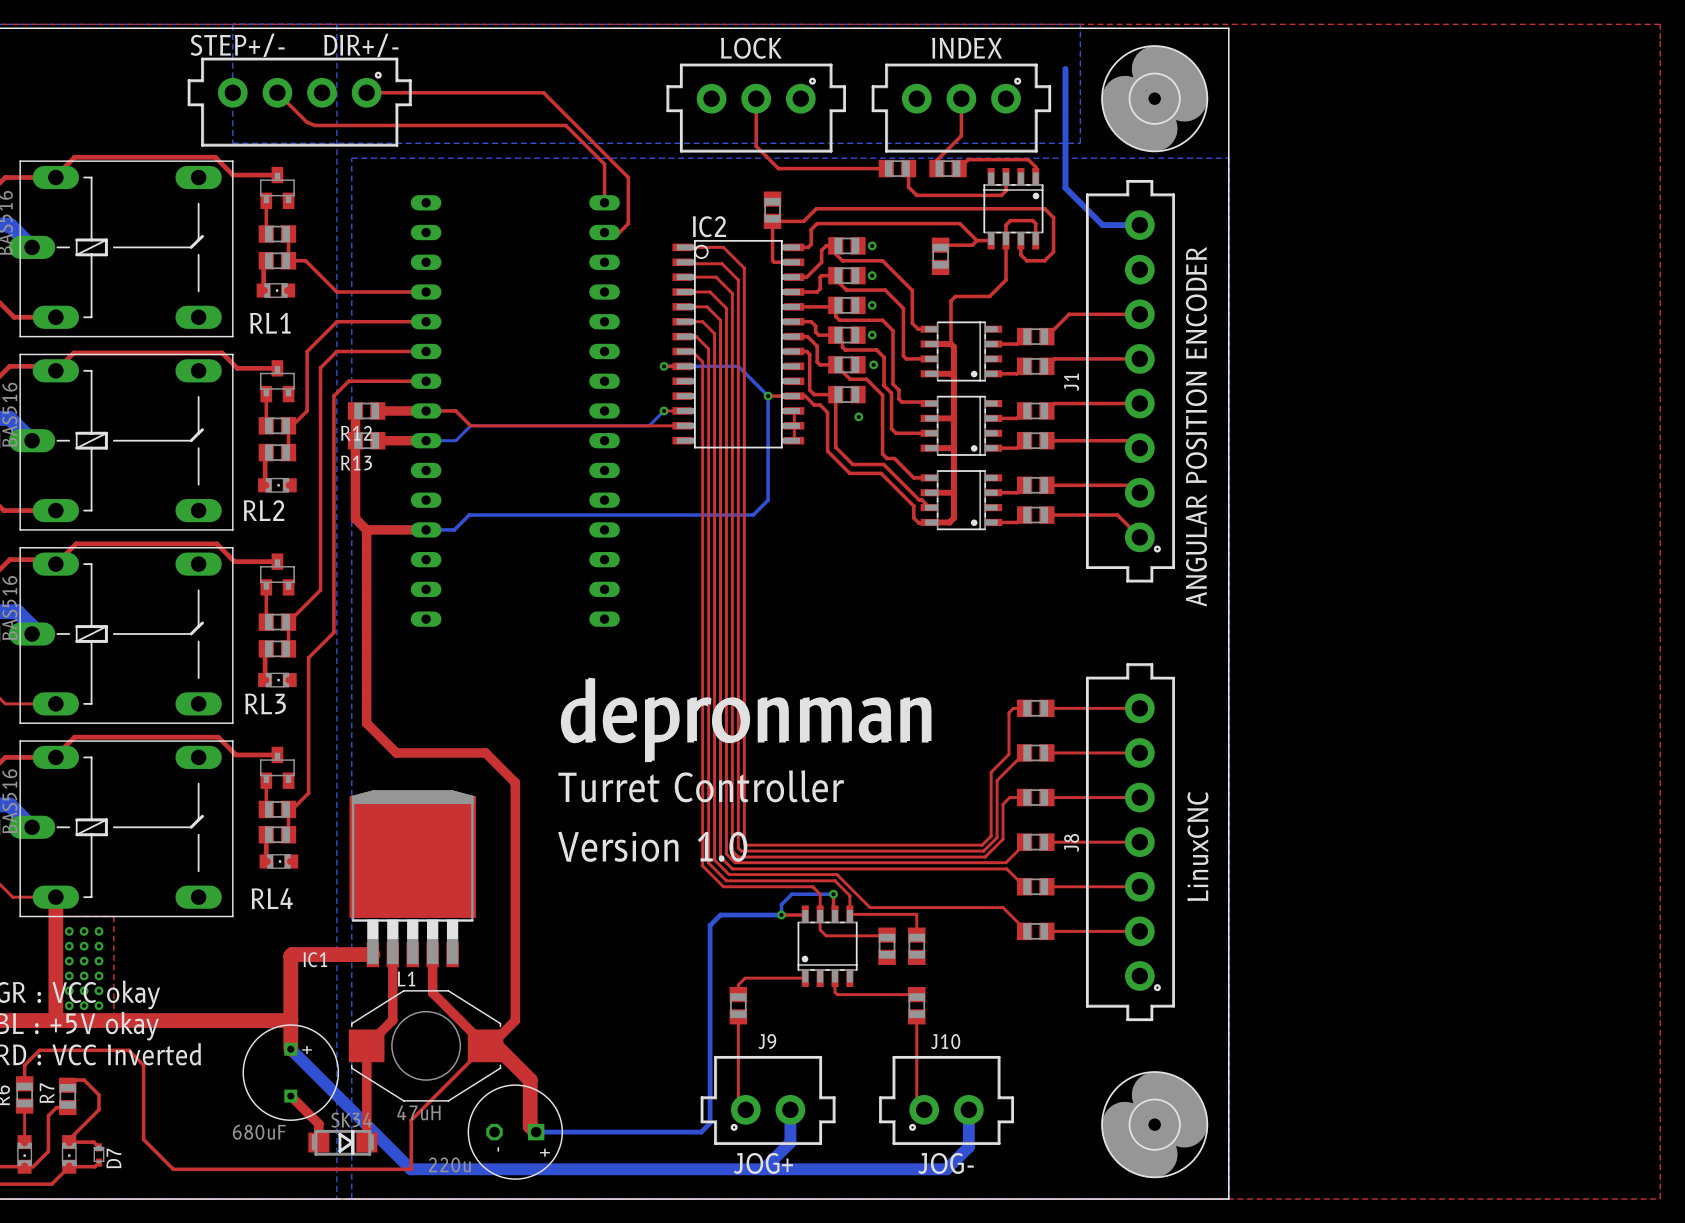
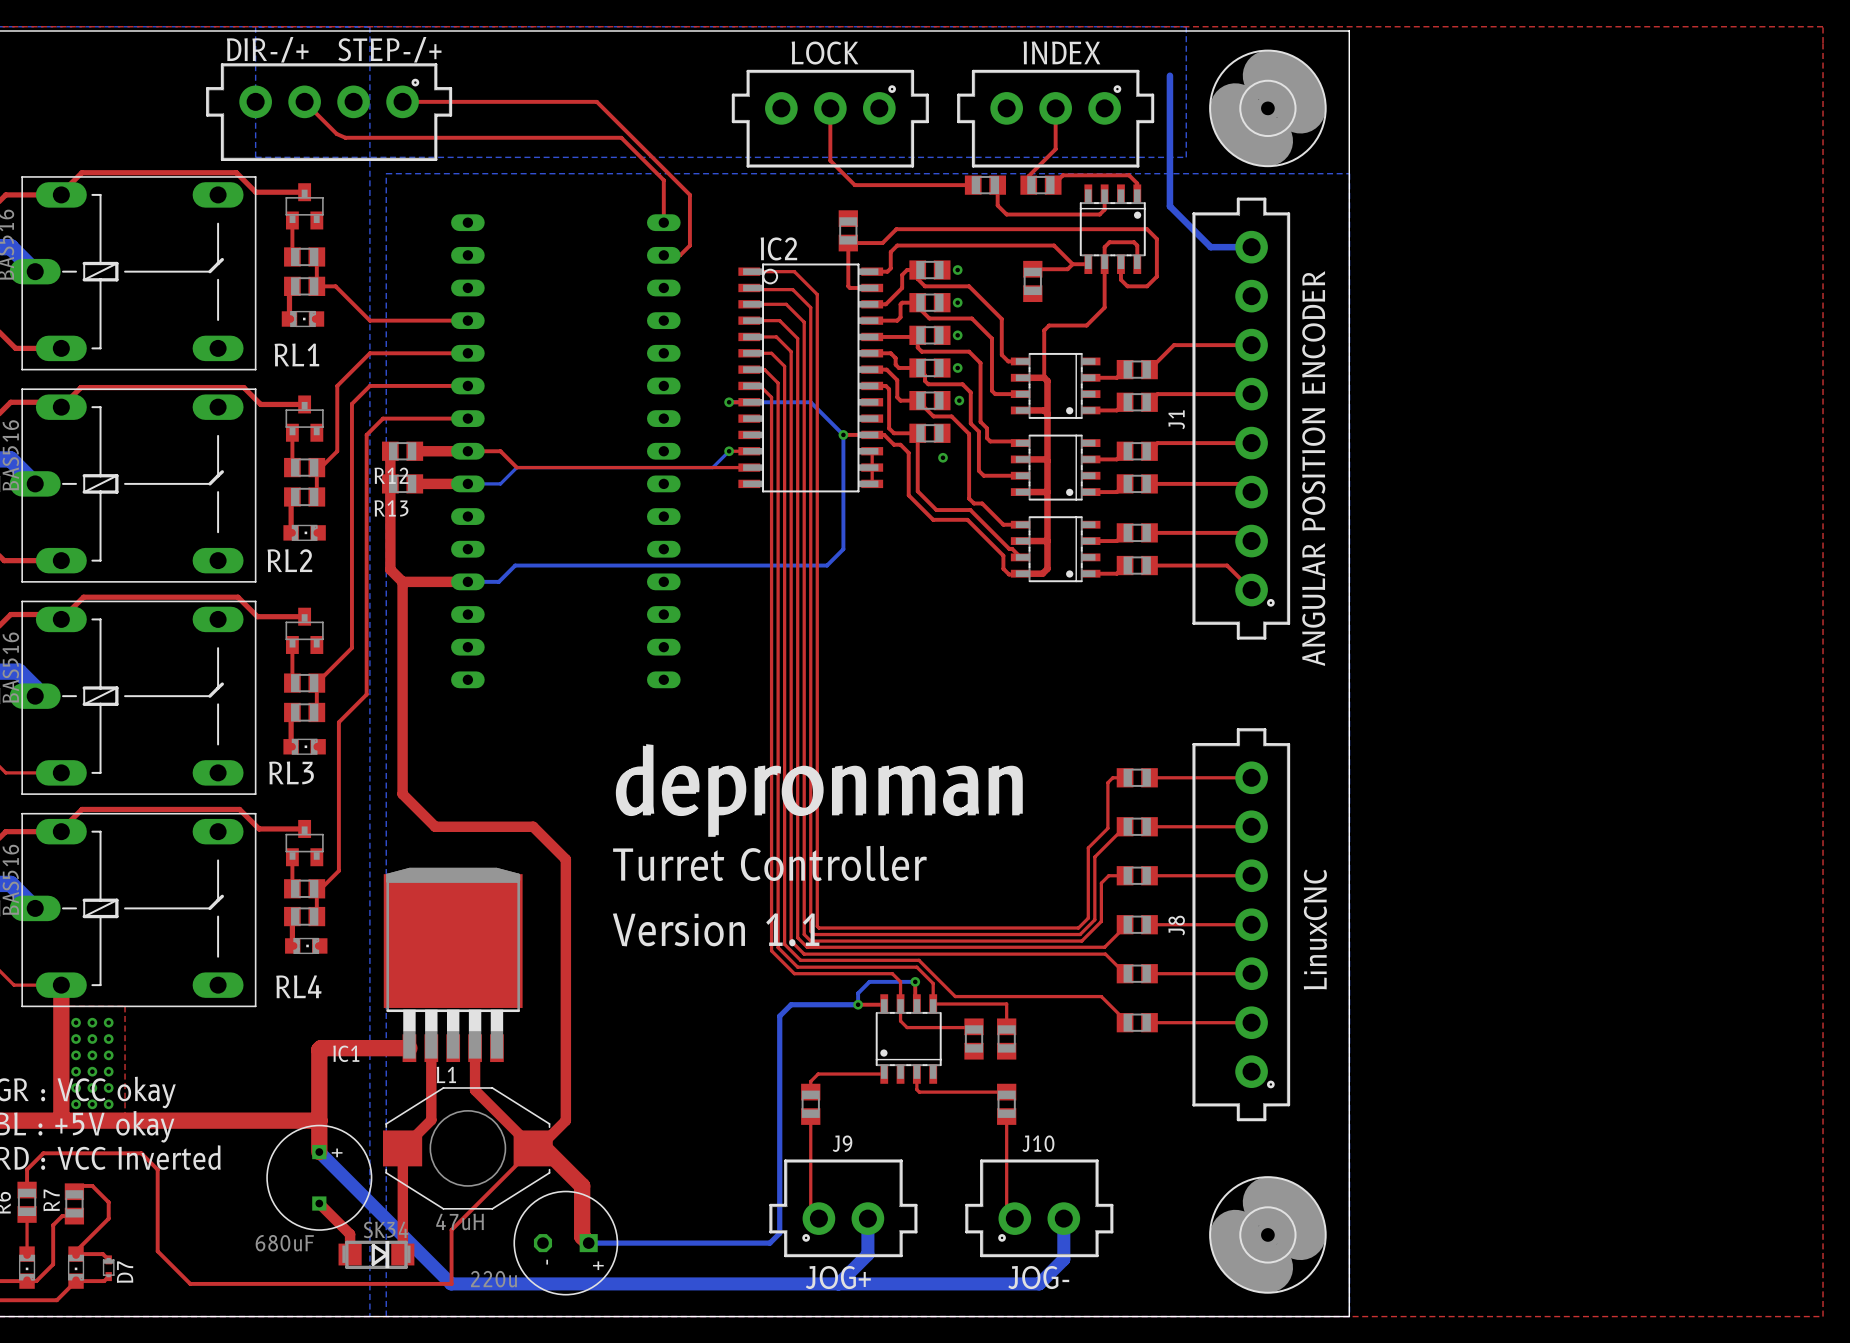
text: STEP+/- (237, 45) -> STEP-/+ (389, 49)
text: DIR+/- (361, 45) -> DIR-/+ (267, 49)
text: Version 1.0 (652, 846) -> Version 1.1 (716, 929)

